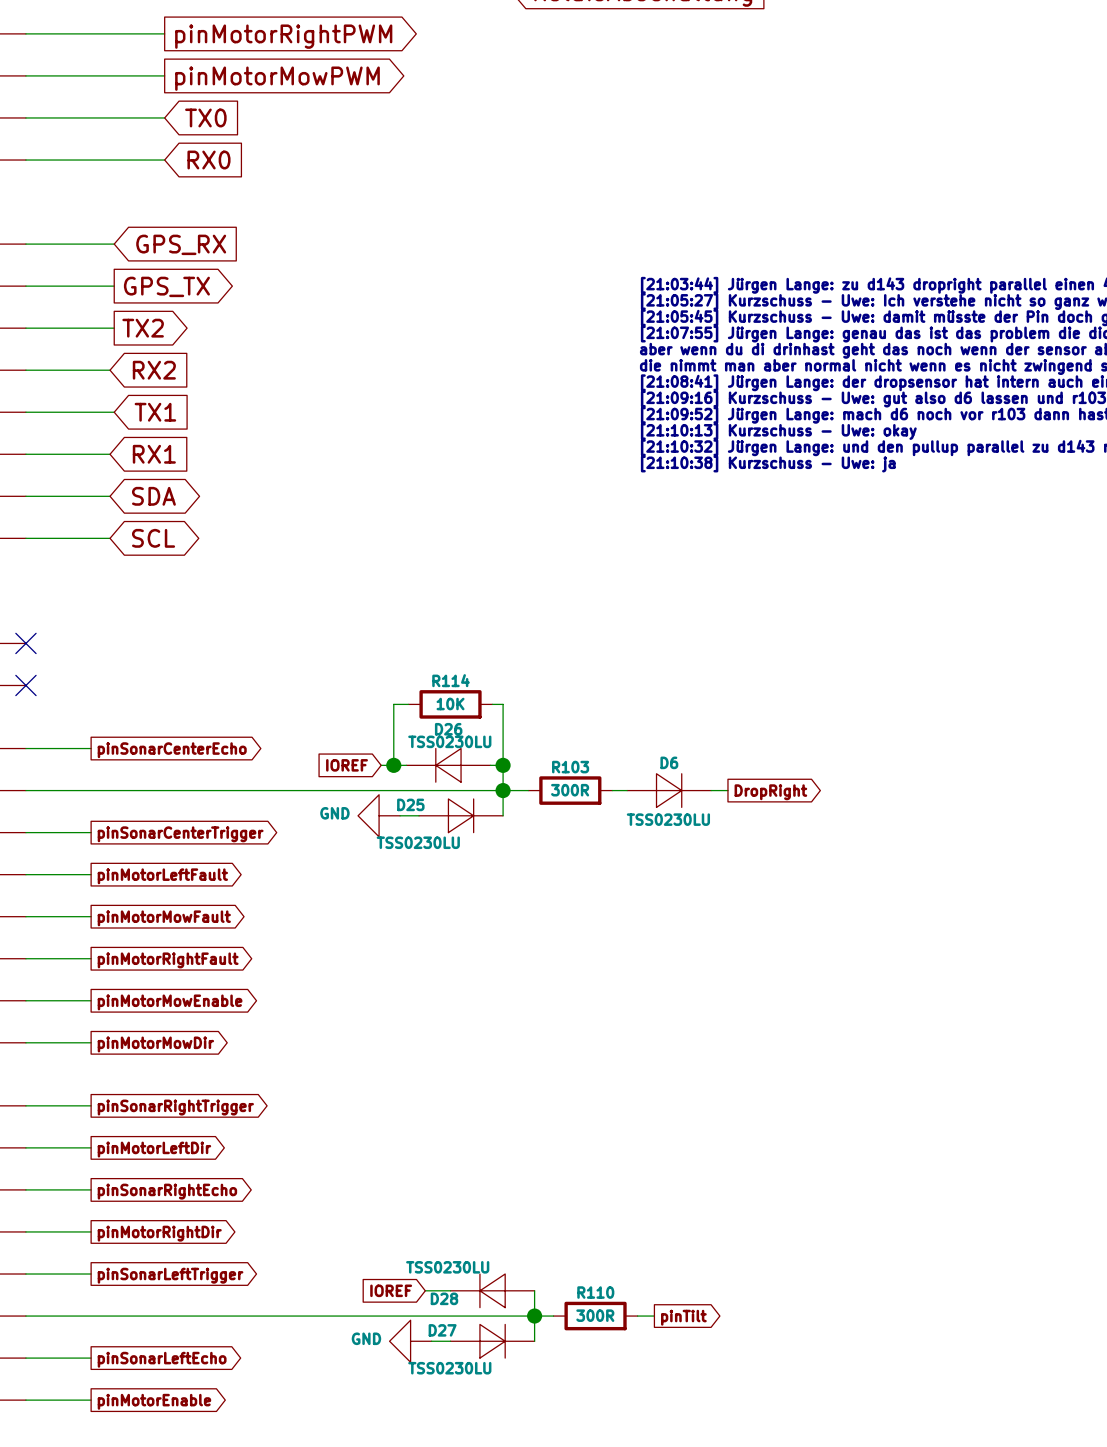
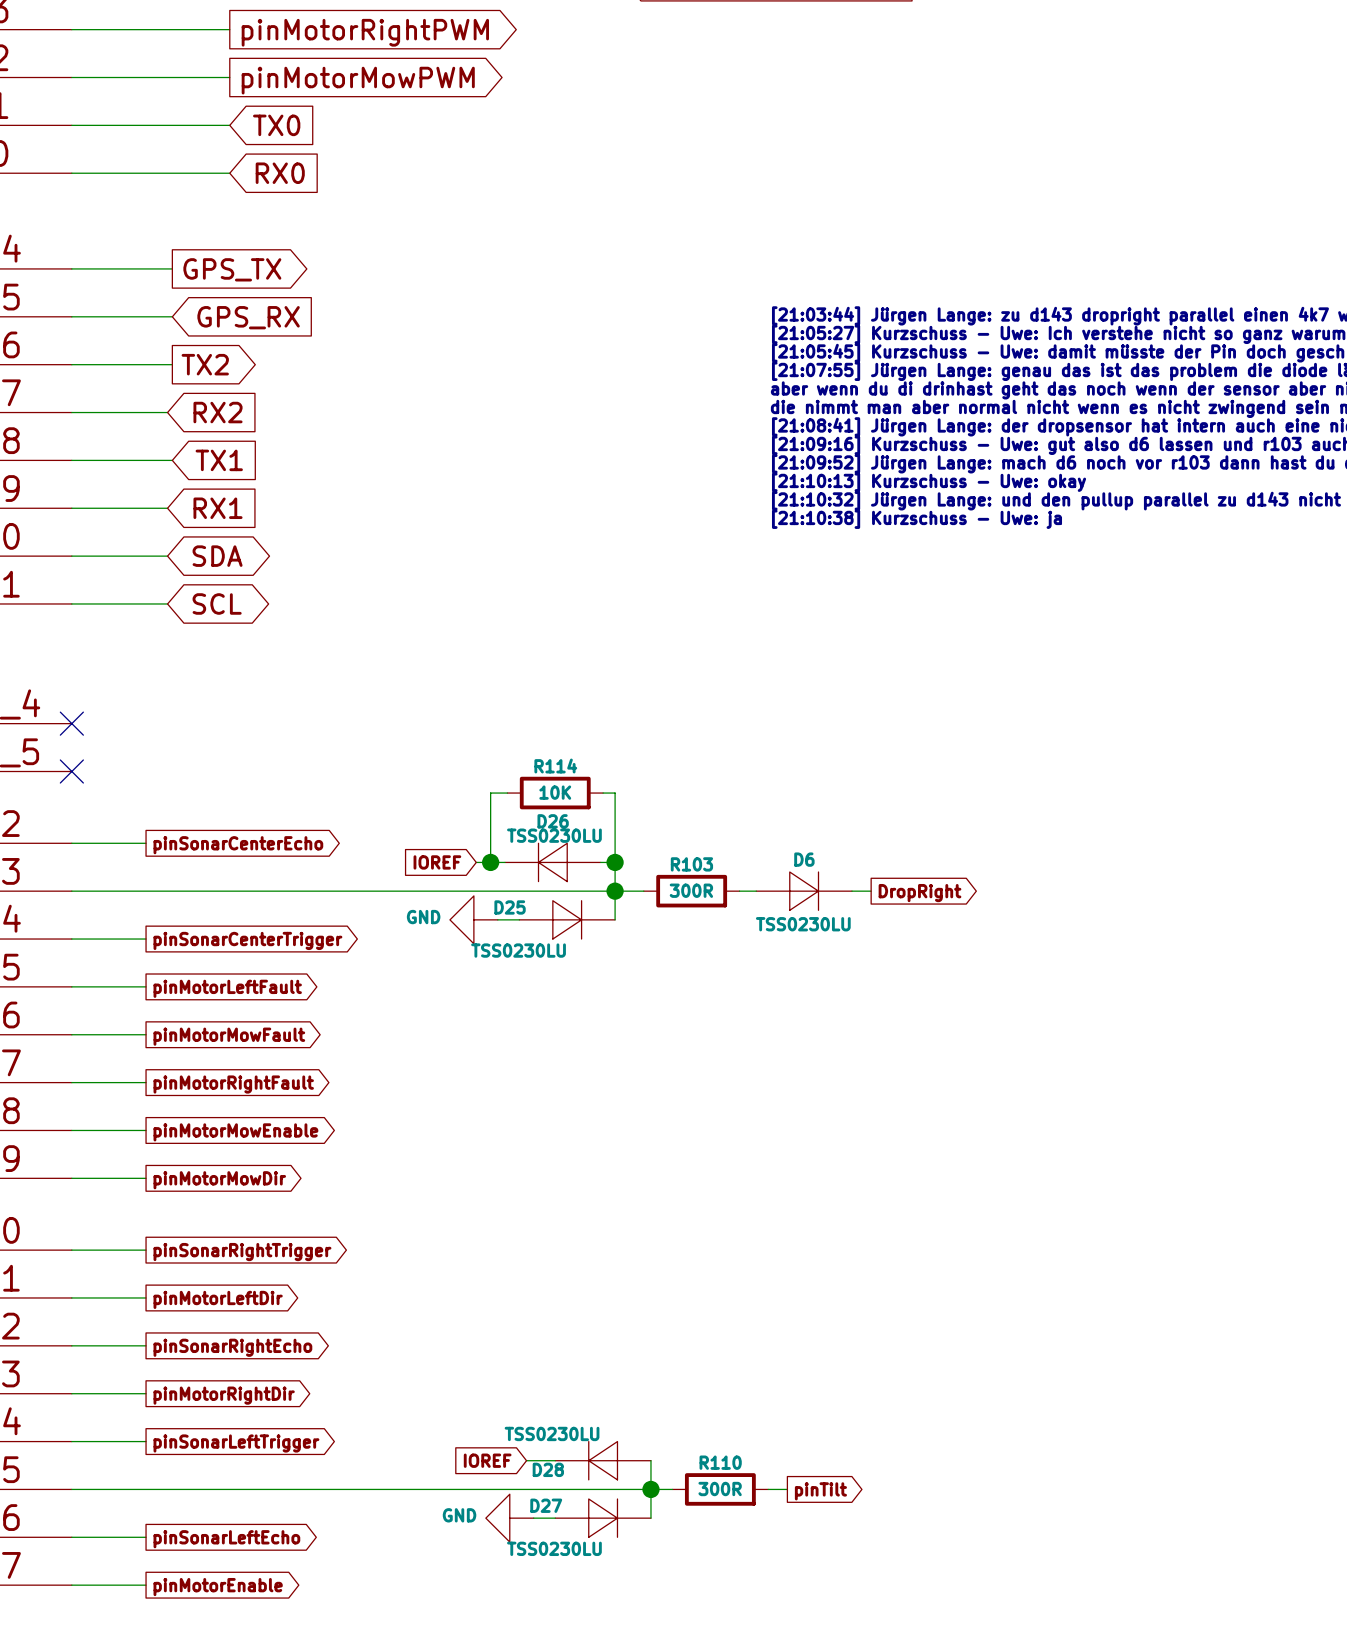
global label shape: input (181, 244) -> output (232, 269)
global label: GPS_RX (181, 244) -> GPS_TX (232, 269)
global label shape: output (166, 286) -> input (248, 317)
global label: GPS_TX (166, 286) -> GPS_RX (248, 317)

